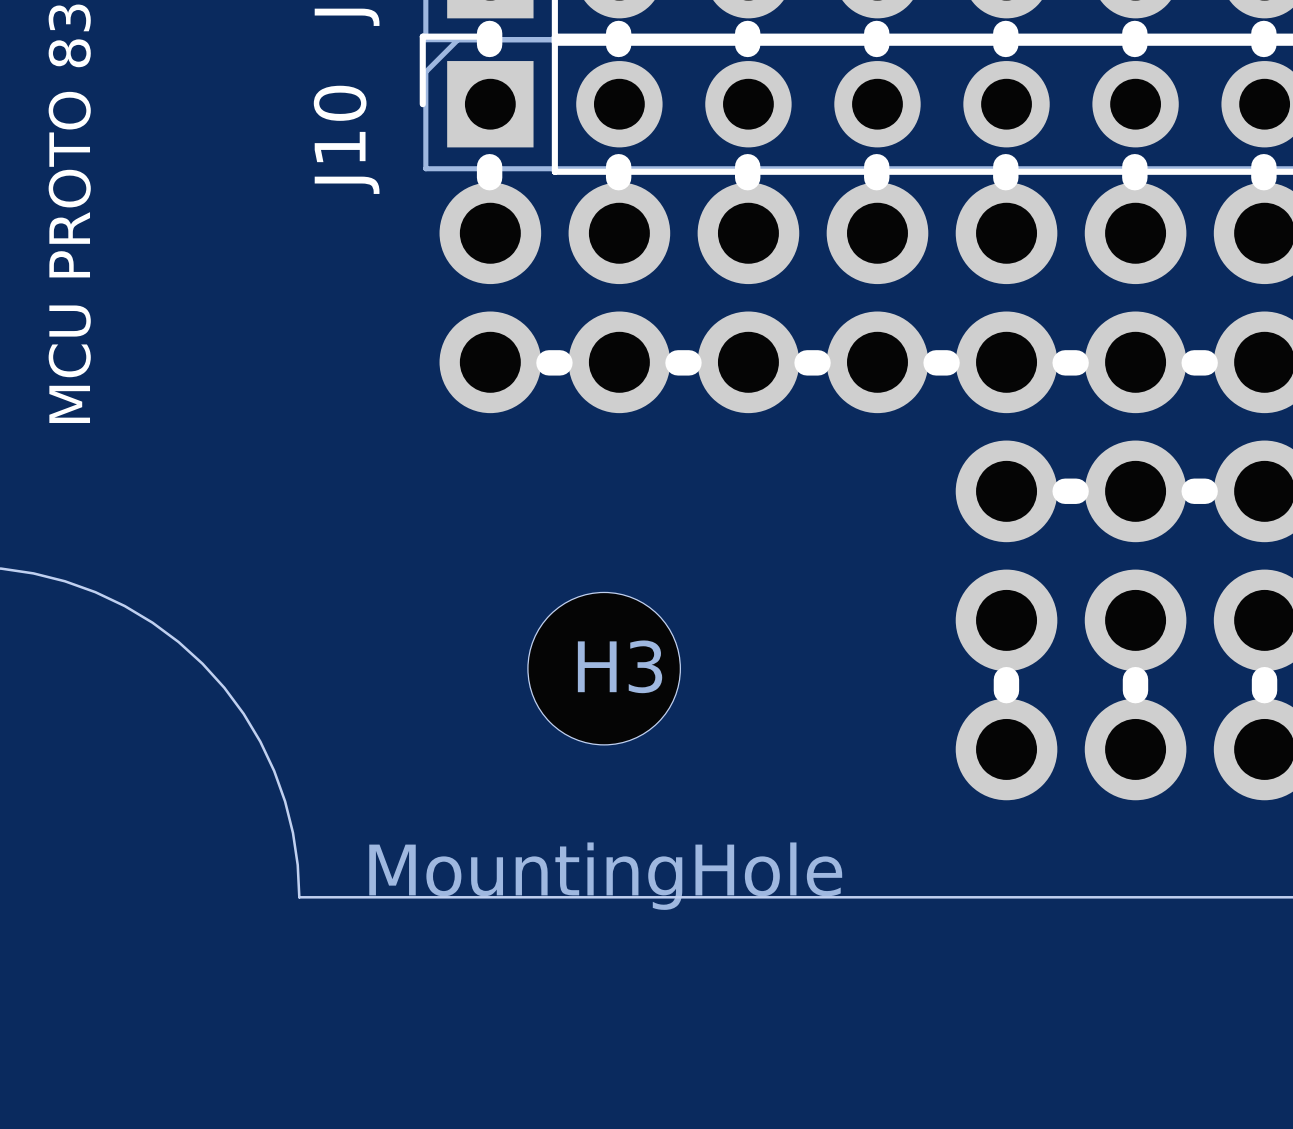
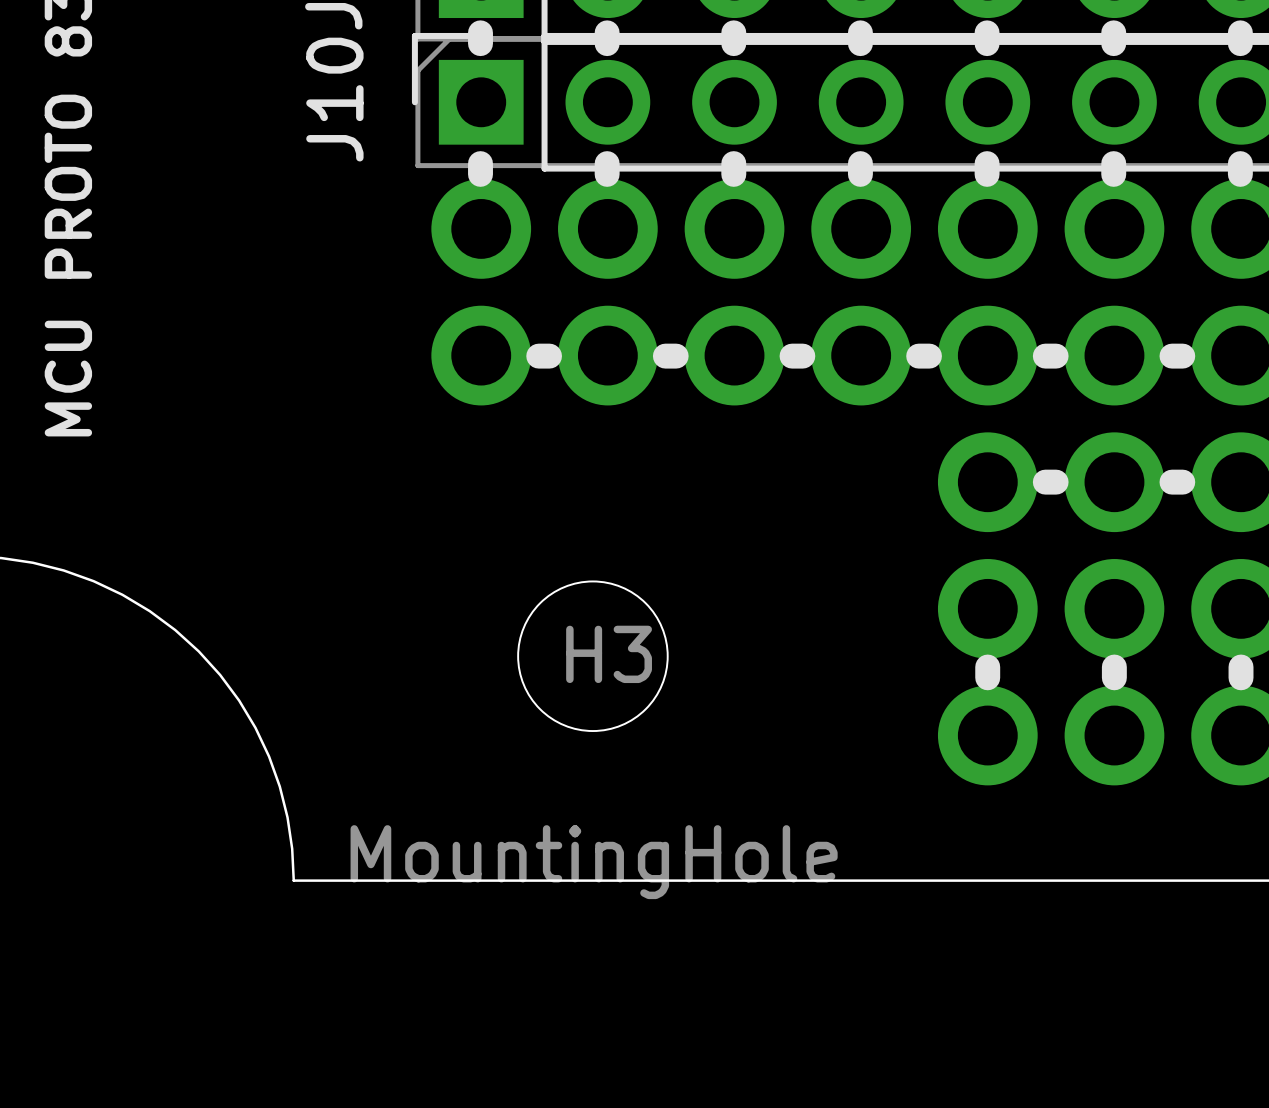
J10 name position: J10 (346, 139) -> J10 (334, 99)

